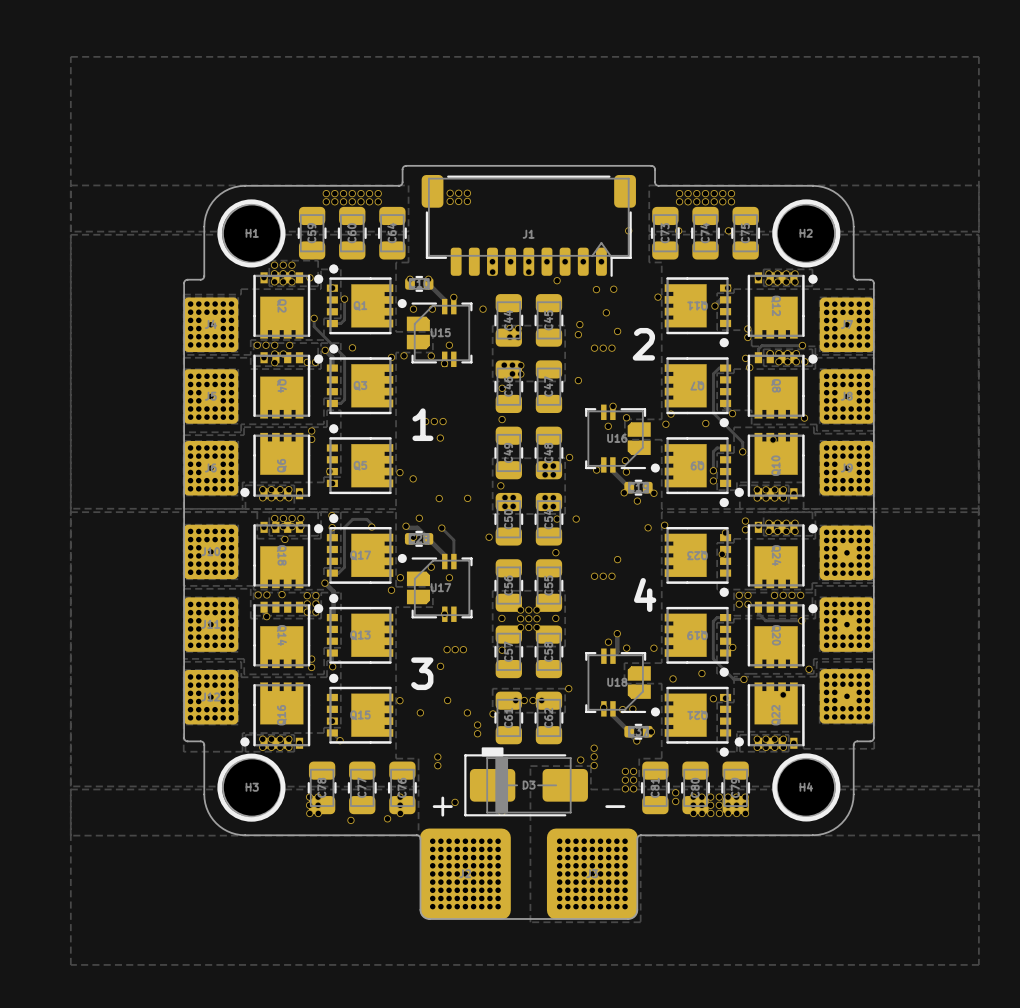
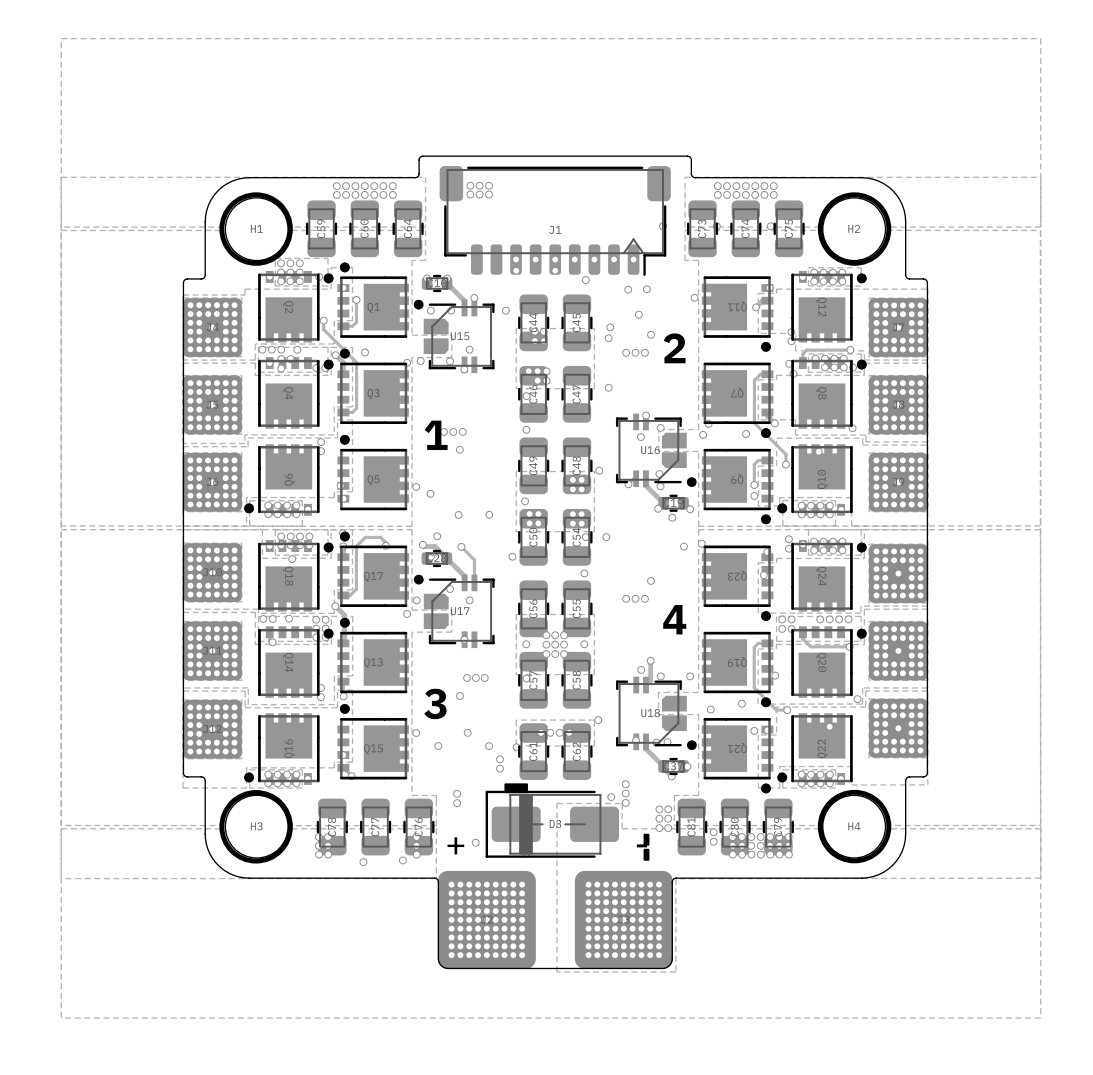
drawing: none -> [643, 833, 650, 861]

